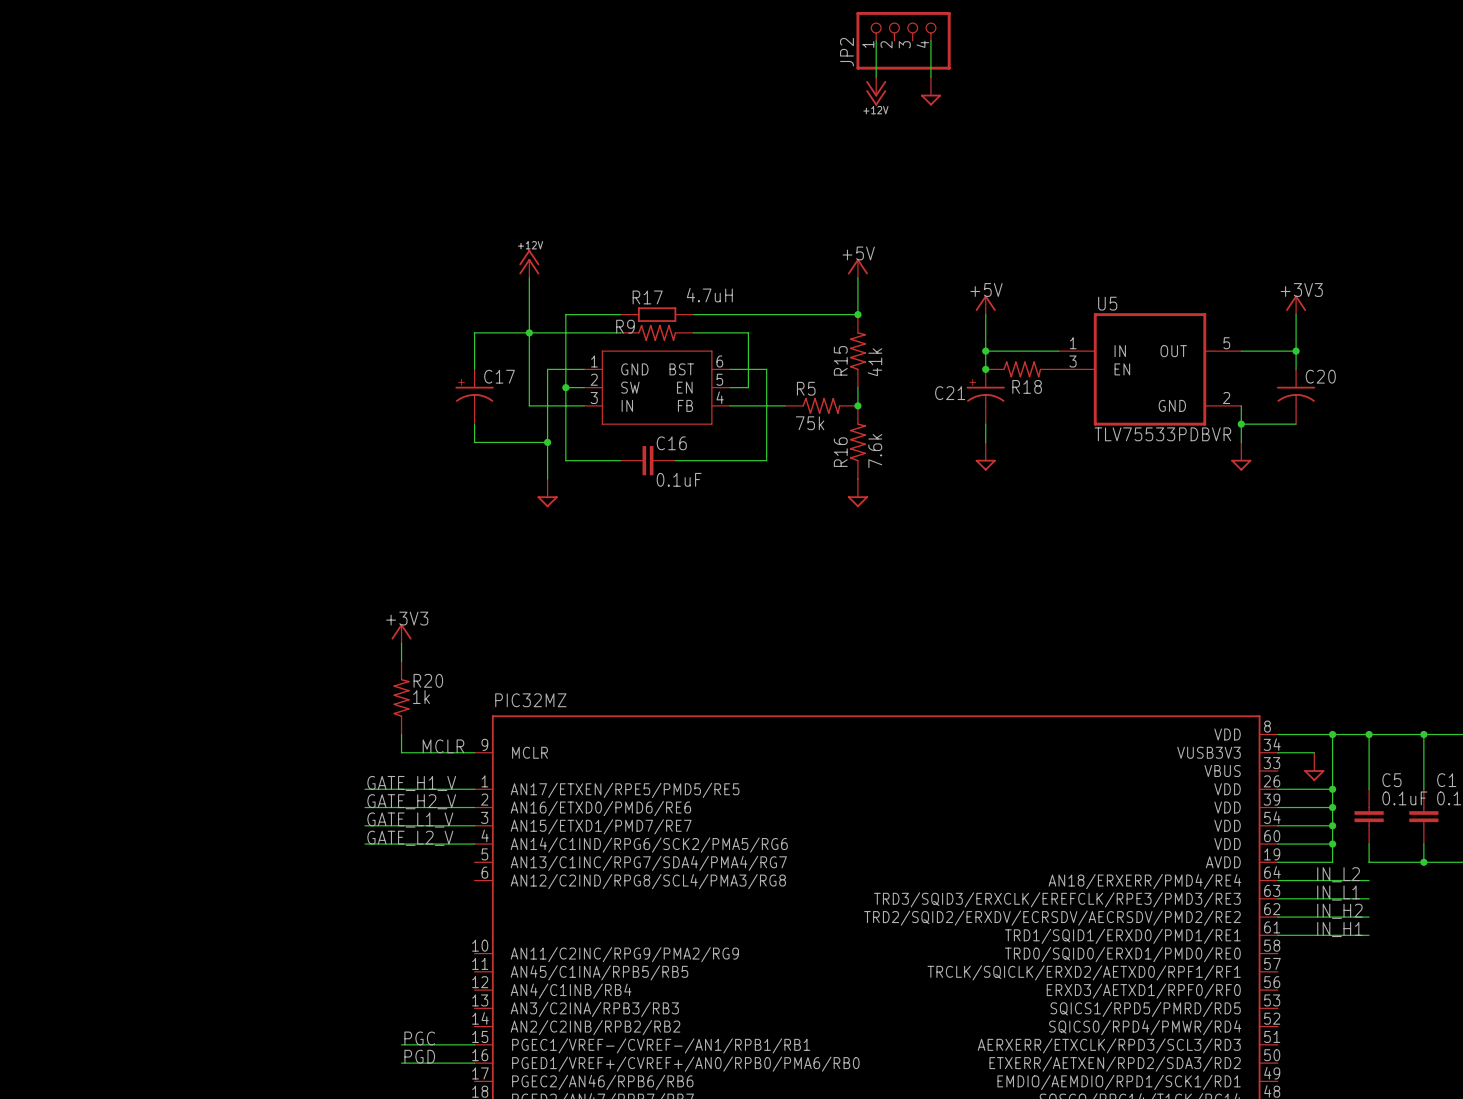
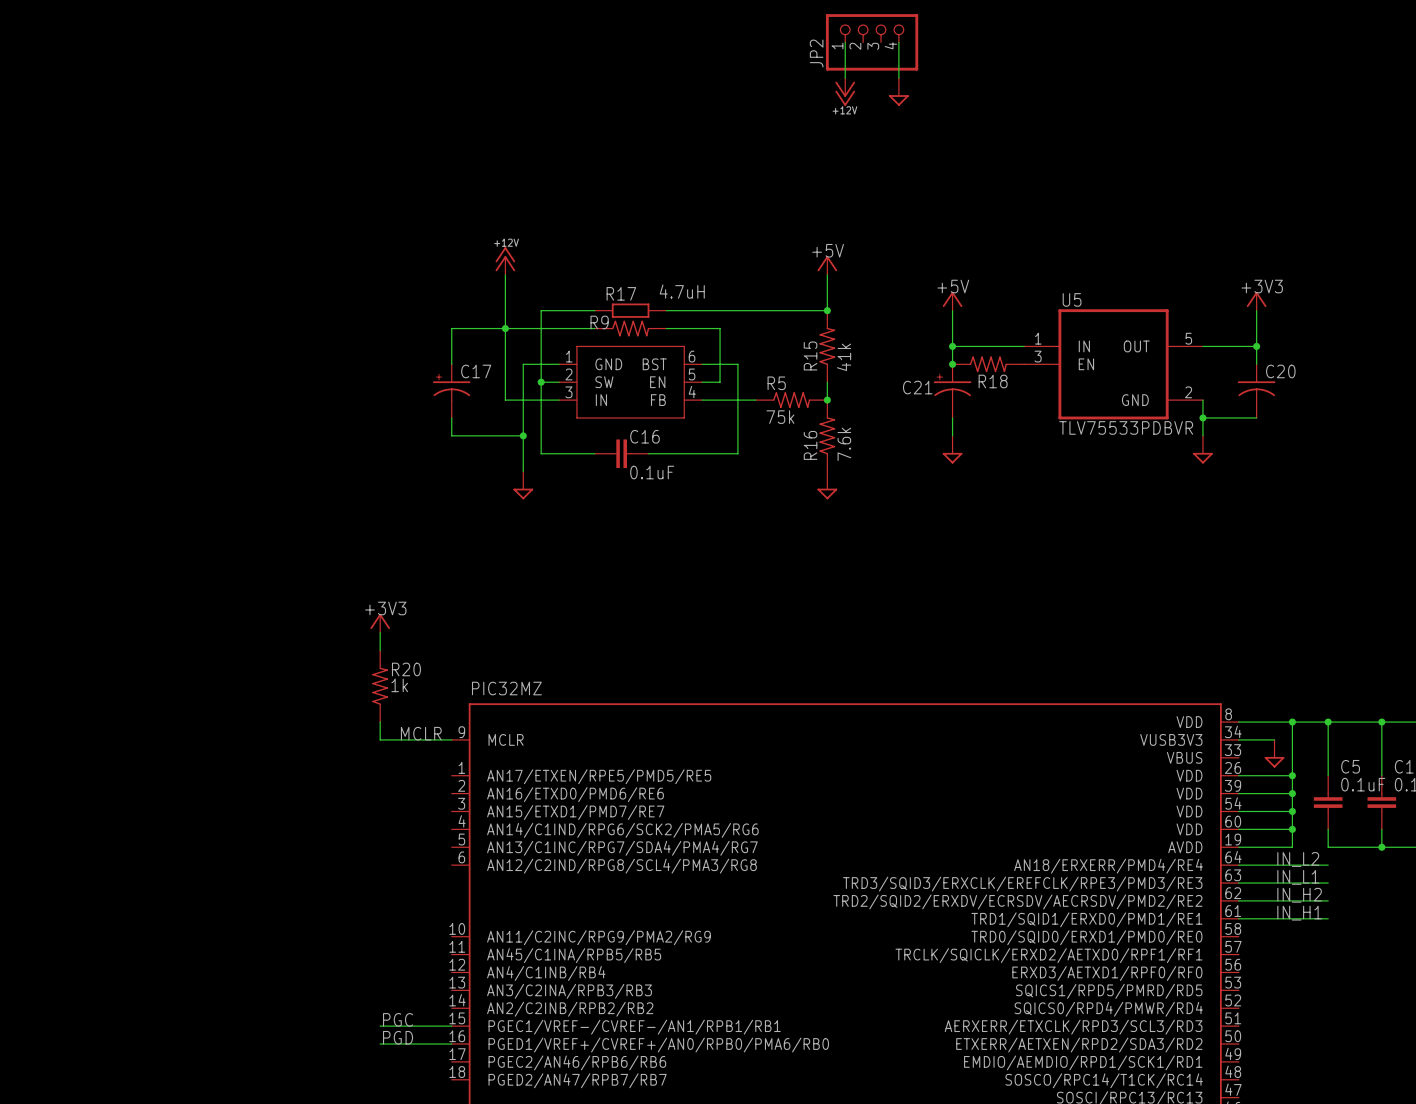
label: GATE_H1_V (411, 783) -> none
wire: (365, 789) (474, 789) -> none
label: GATE_H2_V (411, 801) -> none
wire: (365, 807) (474, 807) -> none
label: GATE_L1_V (410, 820) -> none
wire: (365, 825) (474, 825) -> none
label: GATE_L2_V (410, 838) -> none
wire: (365, 844) (474, 844) -> none

